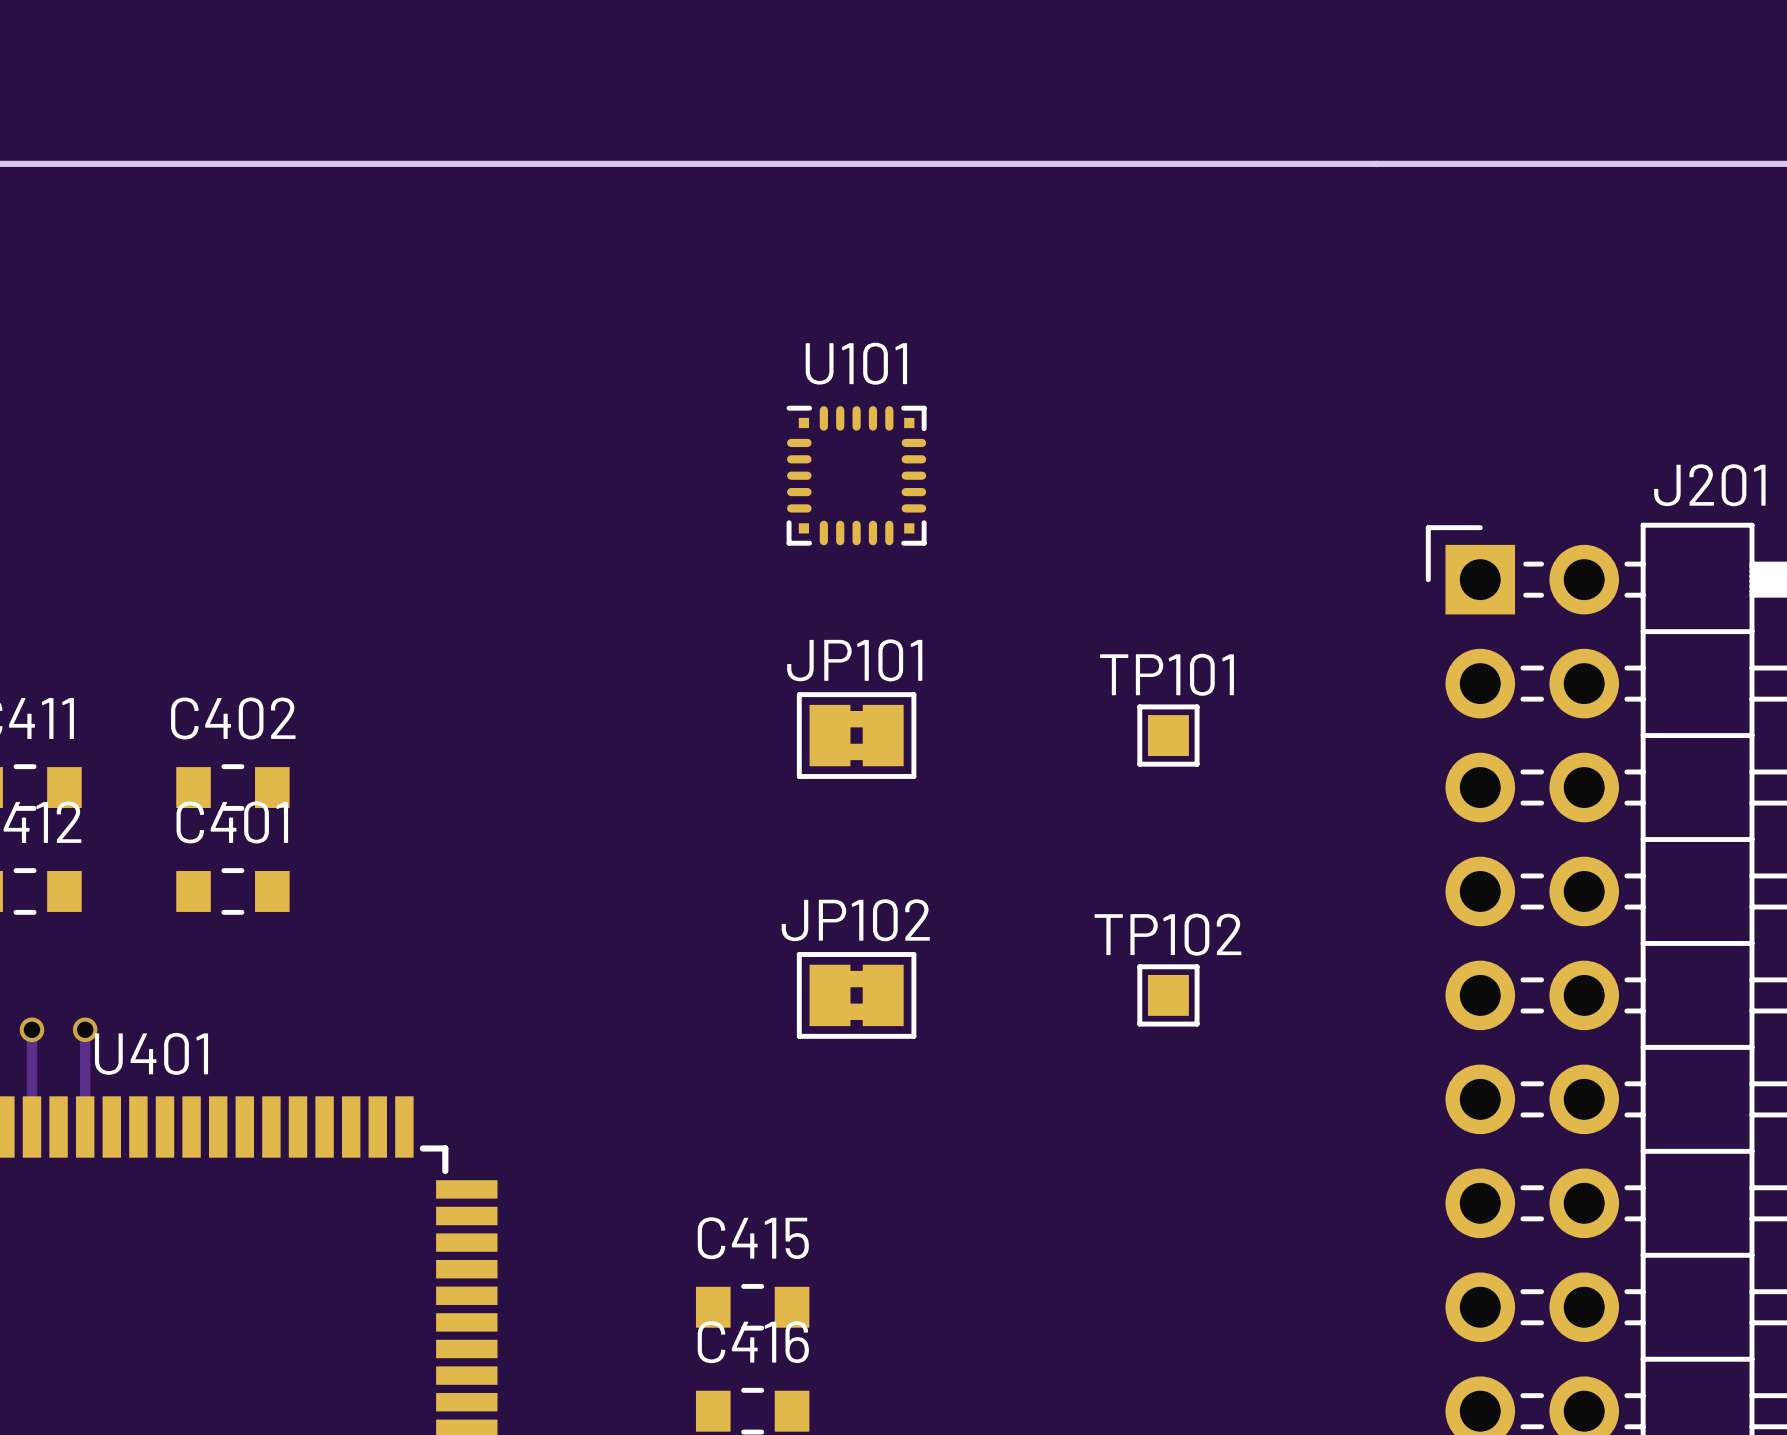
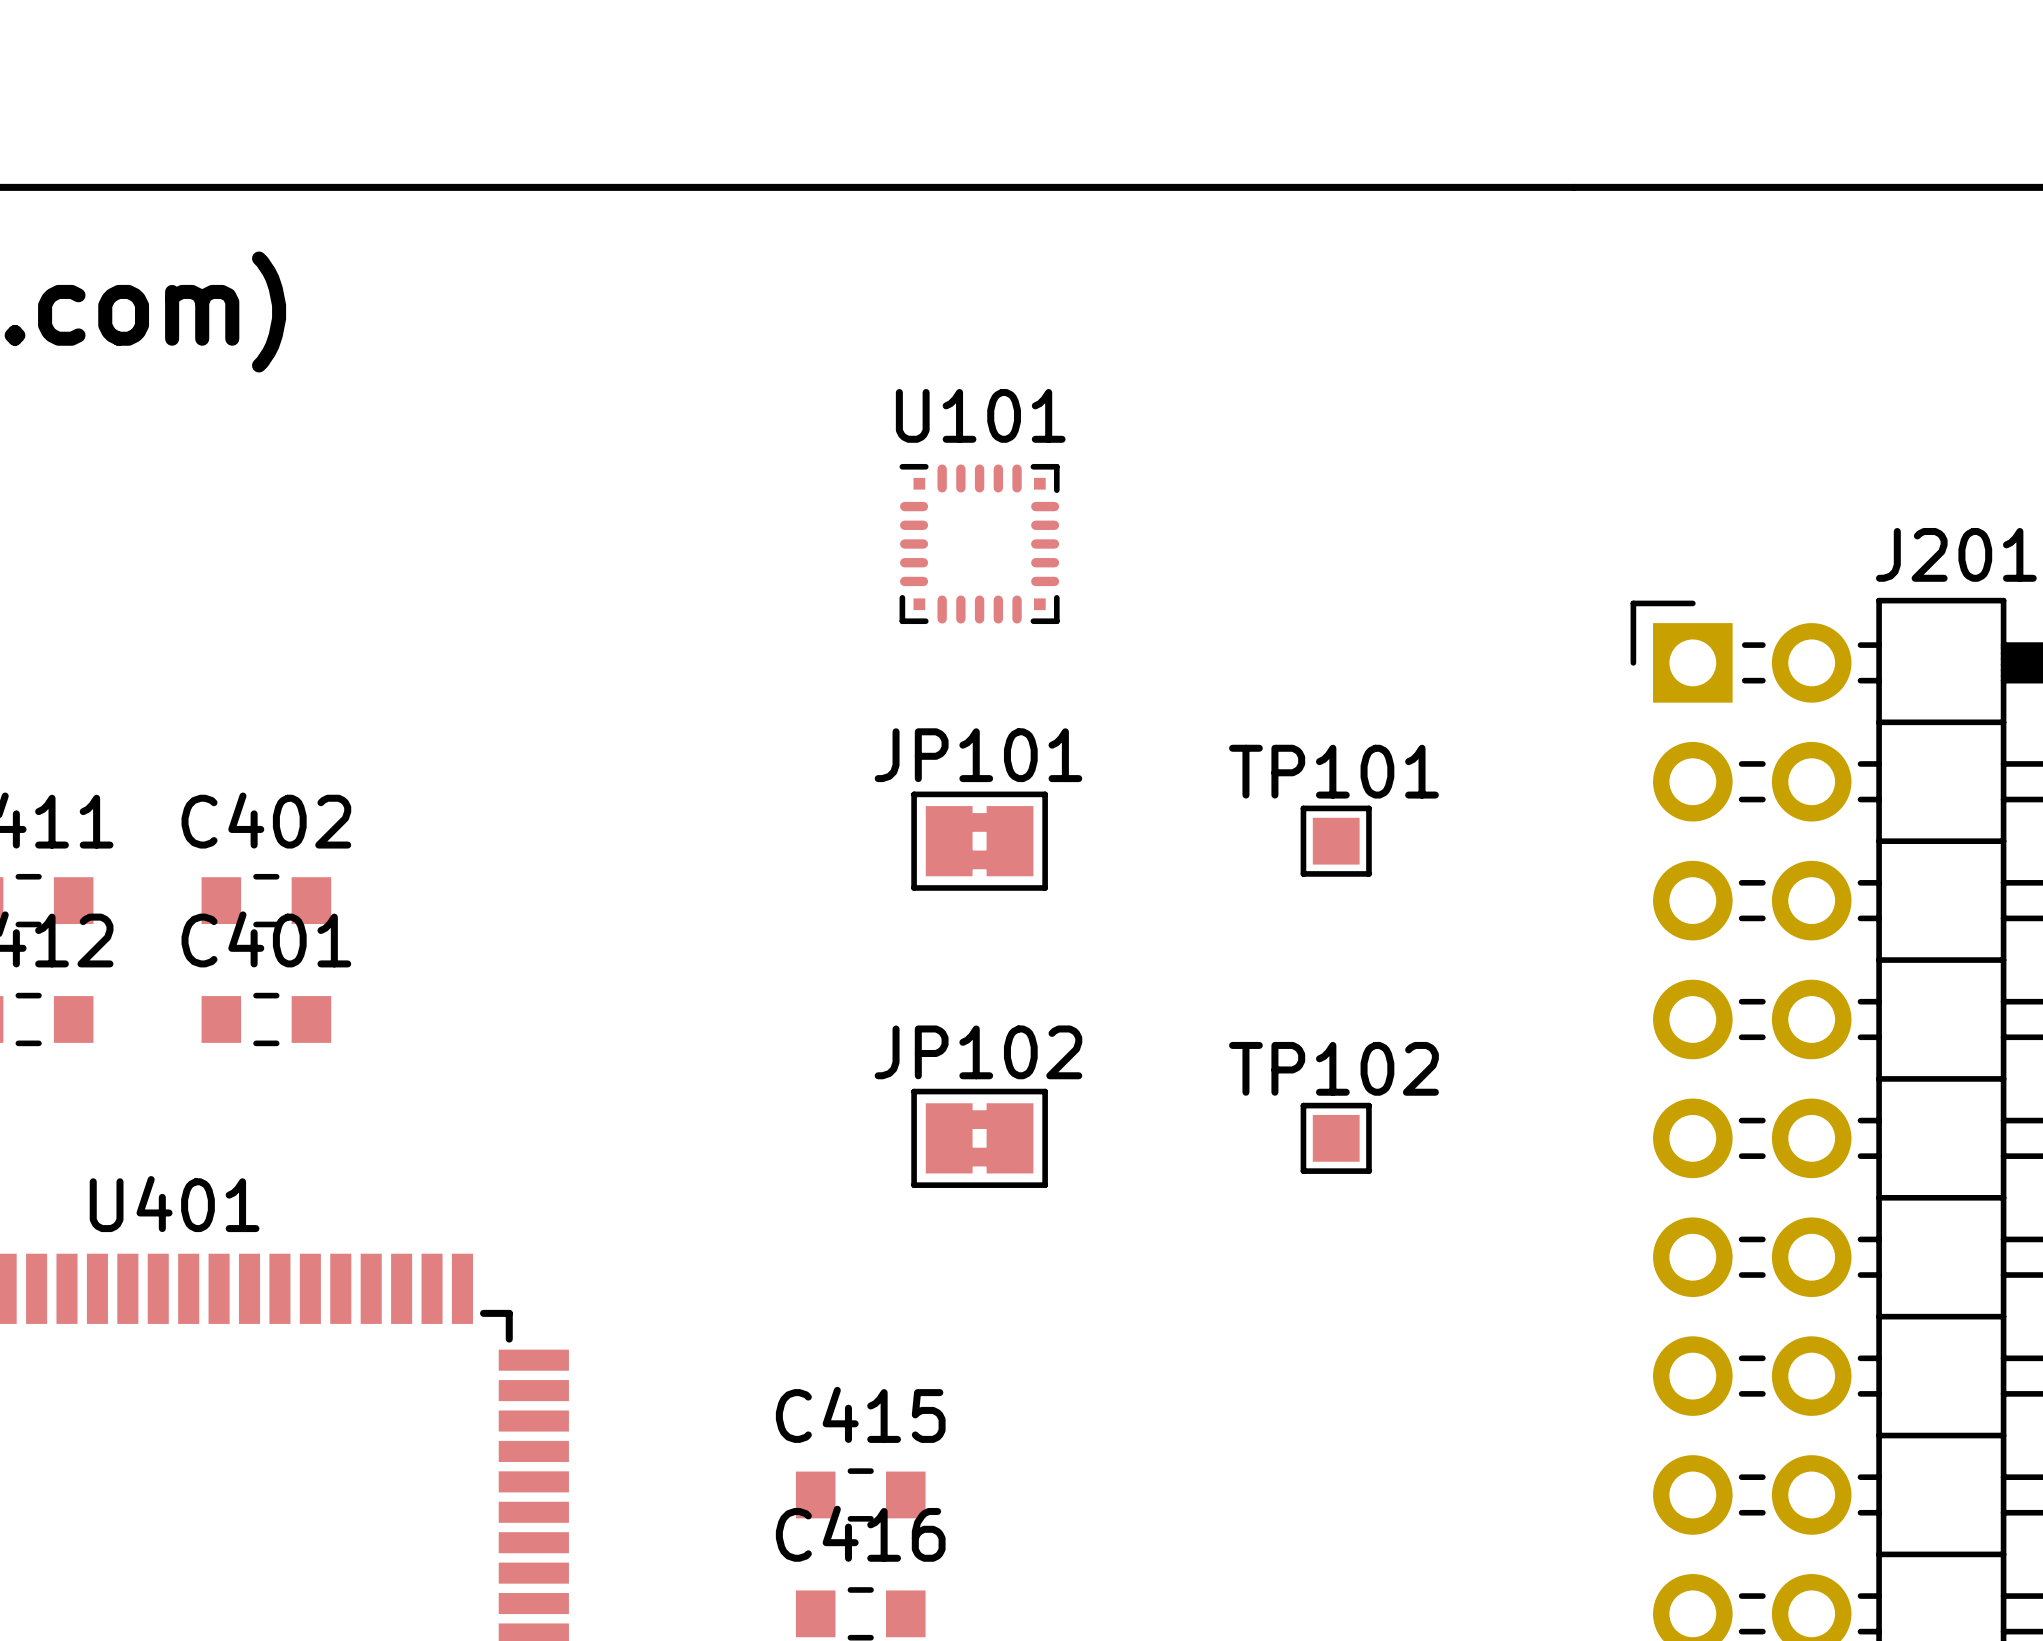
track: (31, 1029) (31, 1126) -> none
via: (31, 1029) -> none
track: (85, 1029) (85, 1126) -> none
via: (85, 1029) -> none

